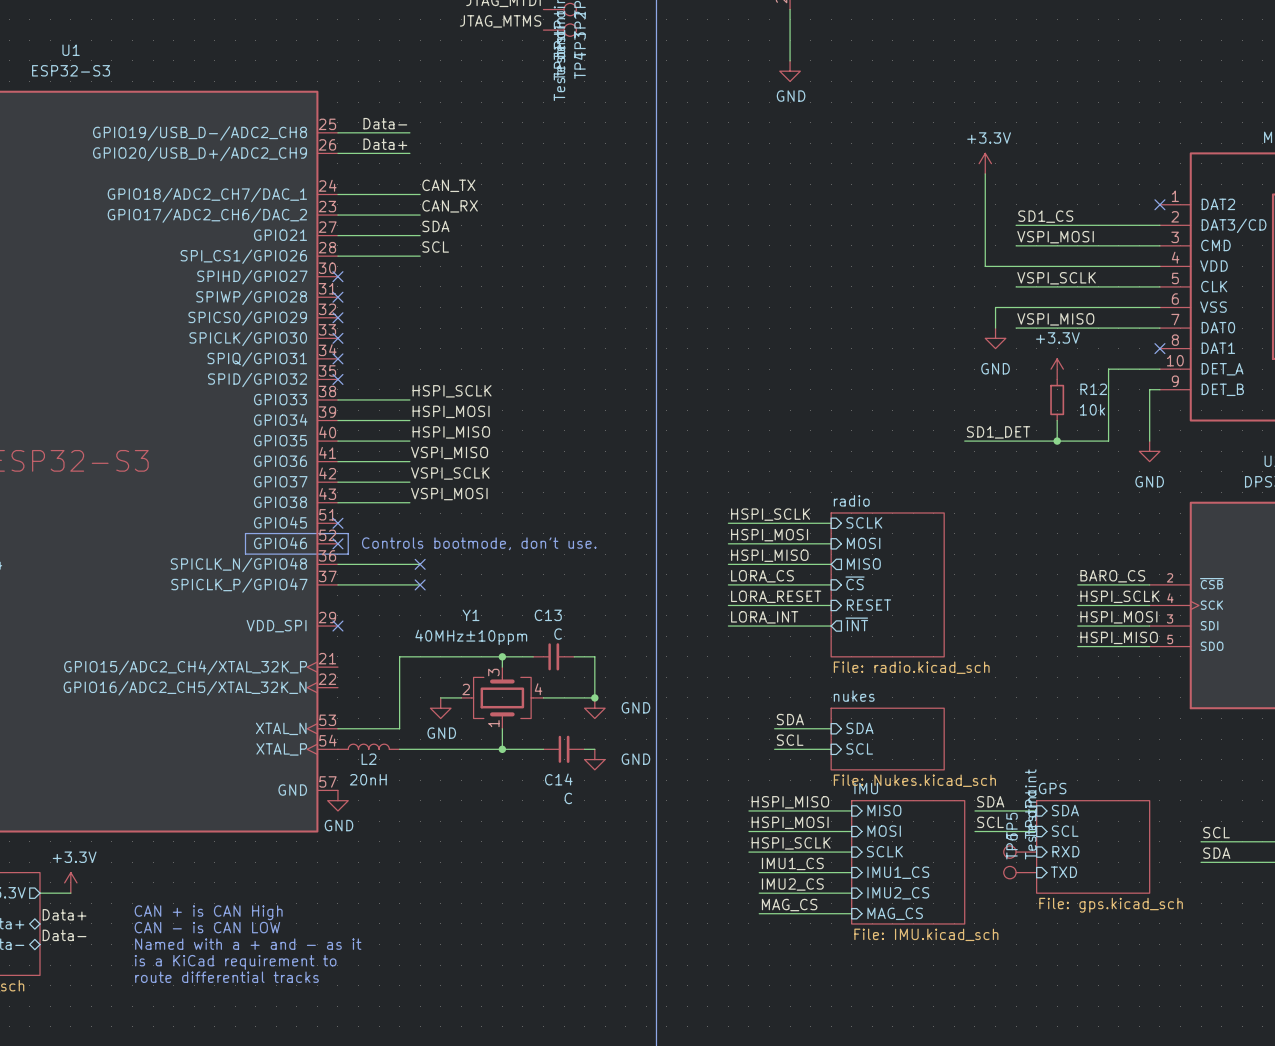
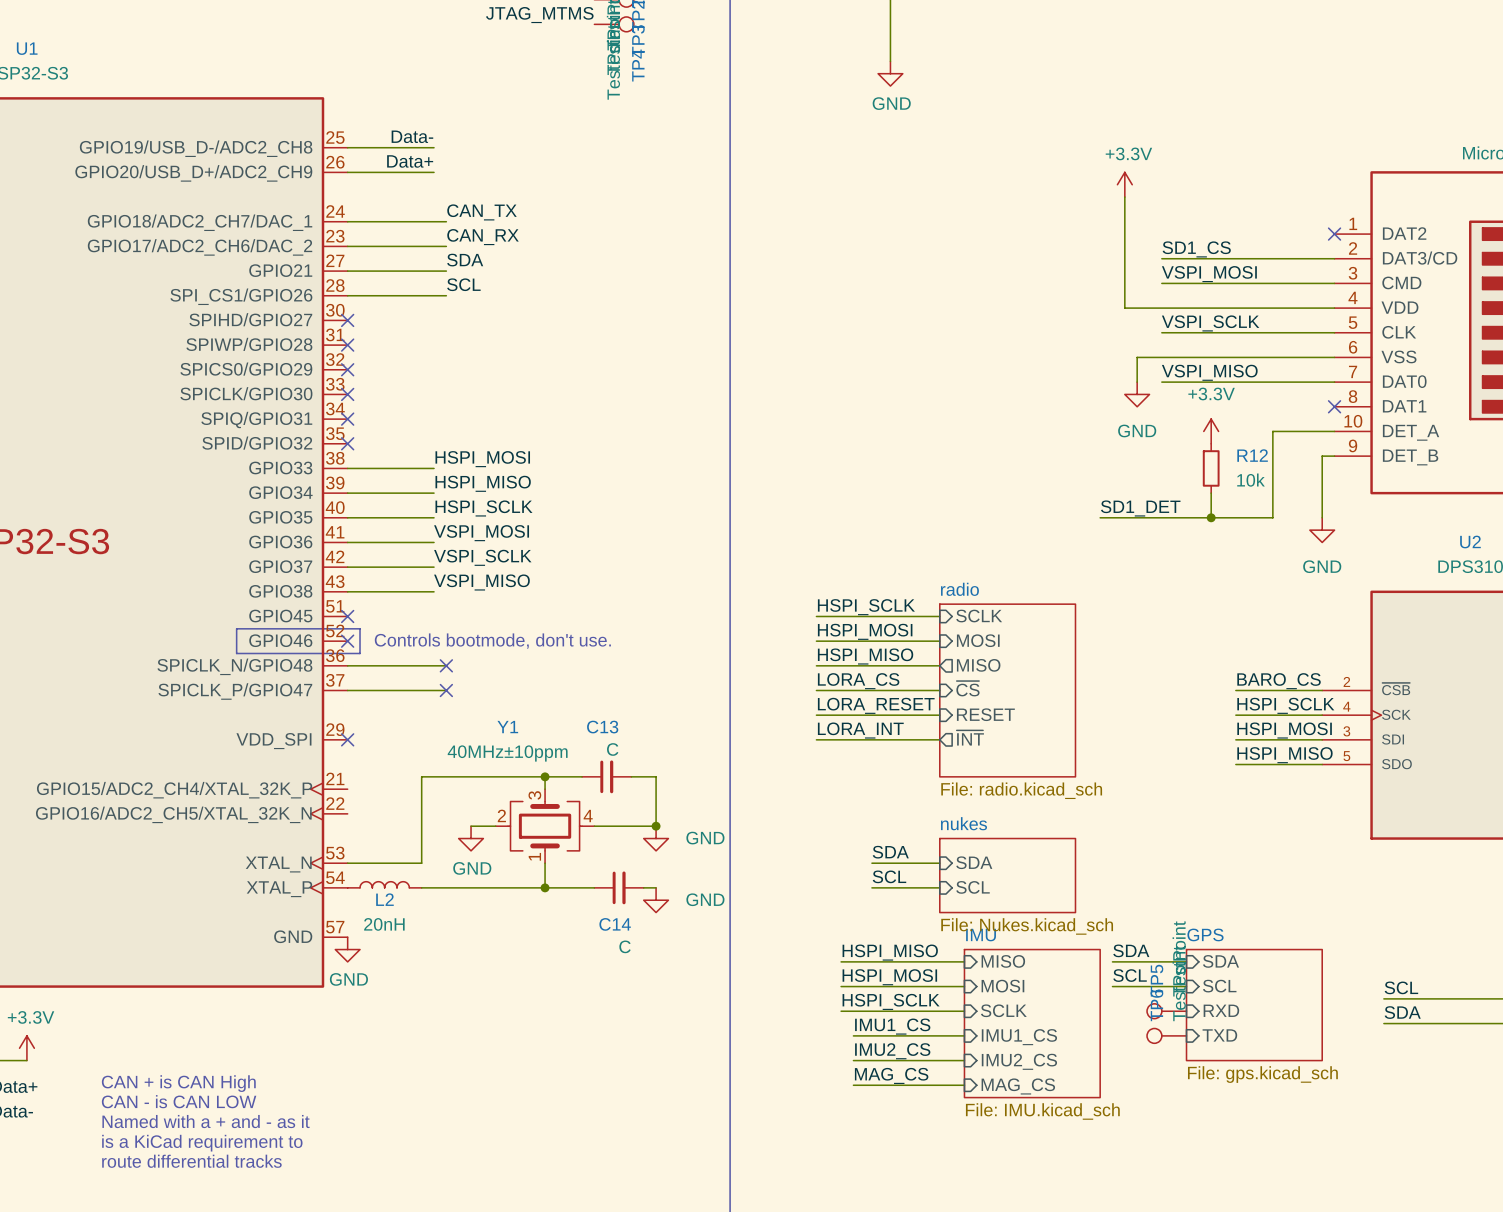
label: HSPI_SCLK (452, 391) -> HSPI_MOSI (482, 459)
label: HSPI_MOSI (451, 411) -> HSPI_MISO (483, 483)
label: HSPI_MISO (451, 432) -> HSPI_SCLK (483, 508)
label: VSPI_MISO (449, 452) -> VSPI_MOSI (481, 533)
label: VSPI_MOSI (449, 494) -> VSPI_MISO (481, 582)

